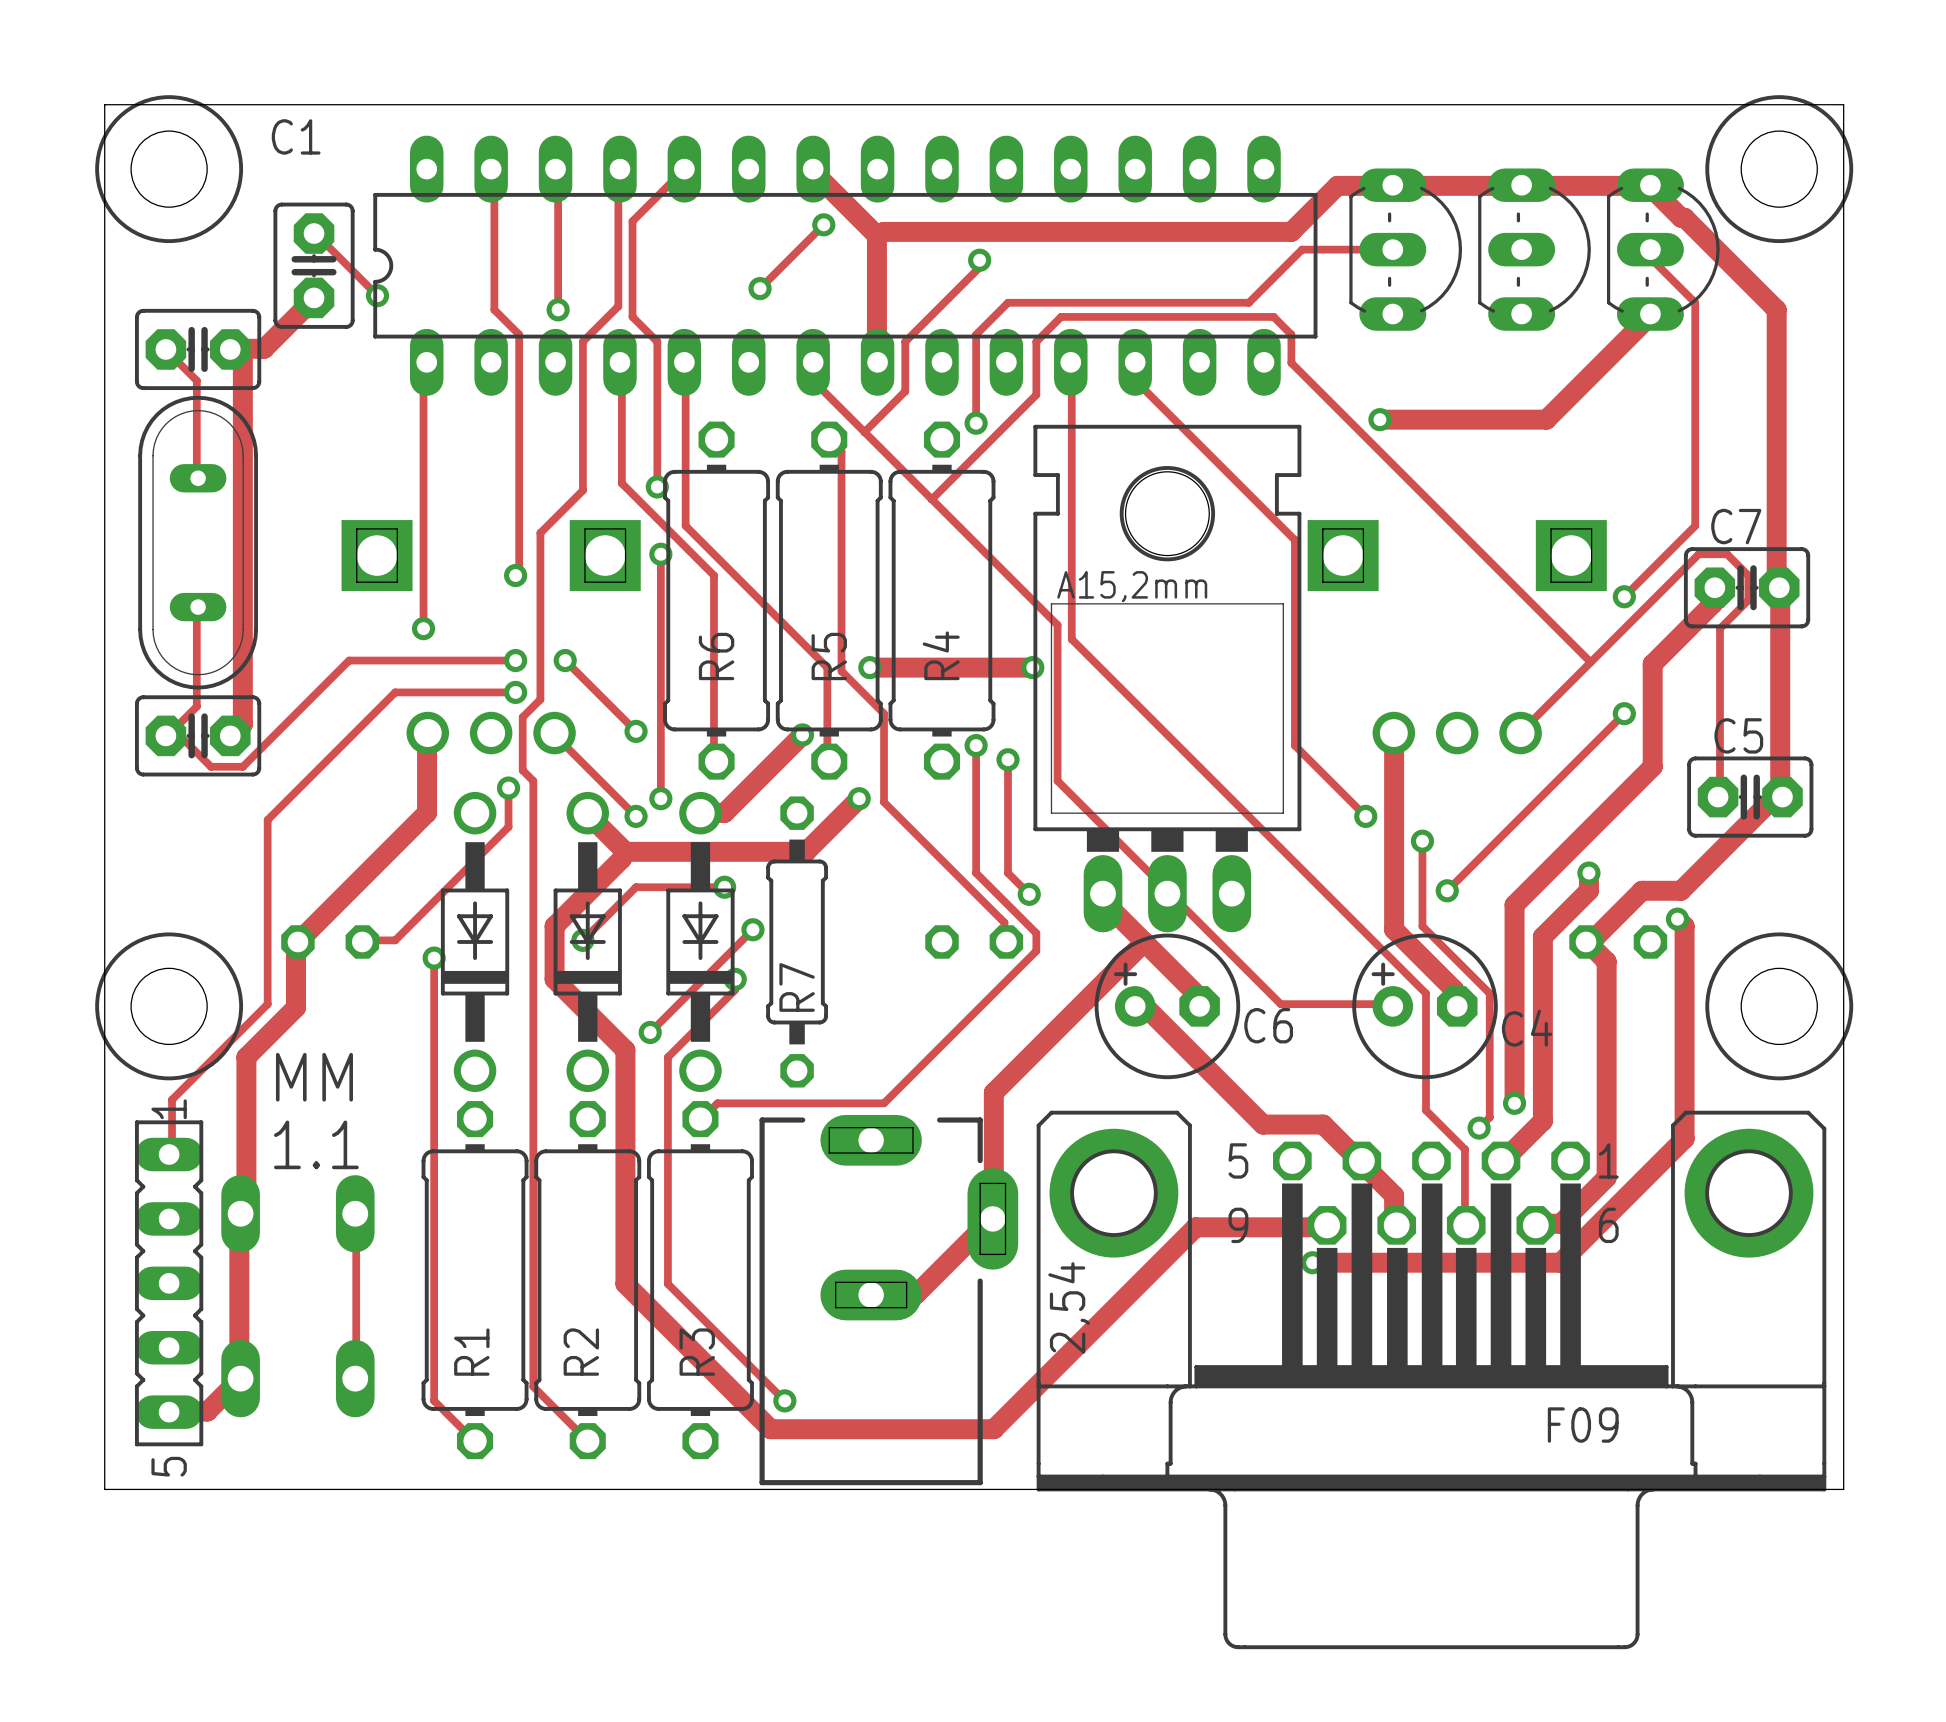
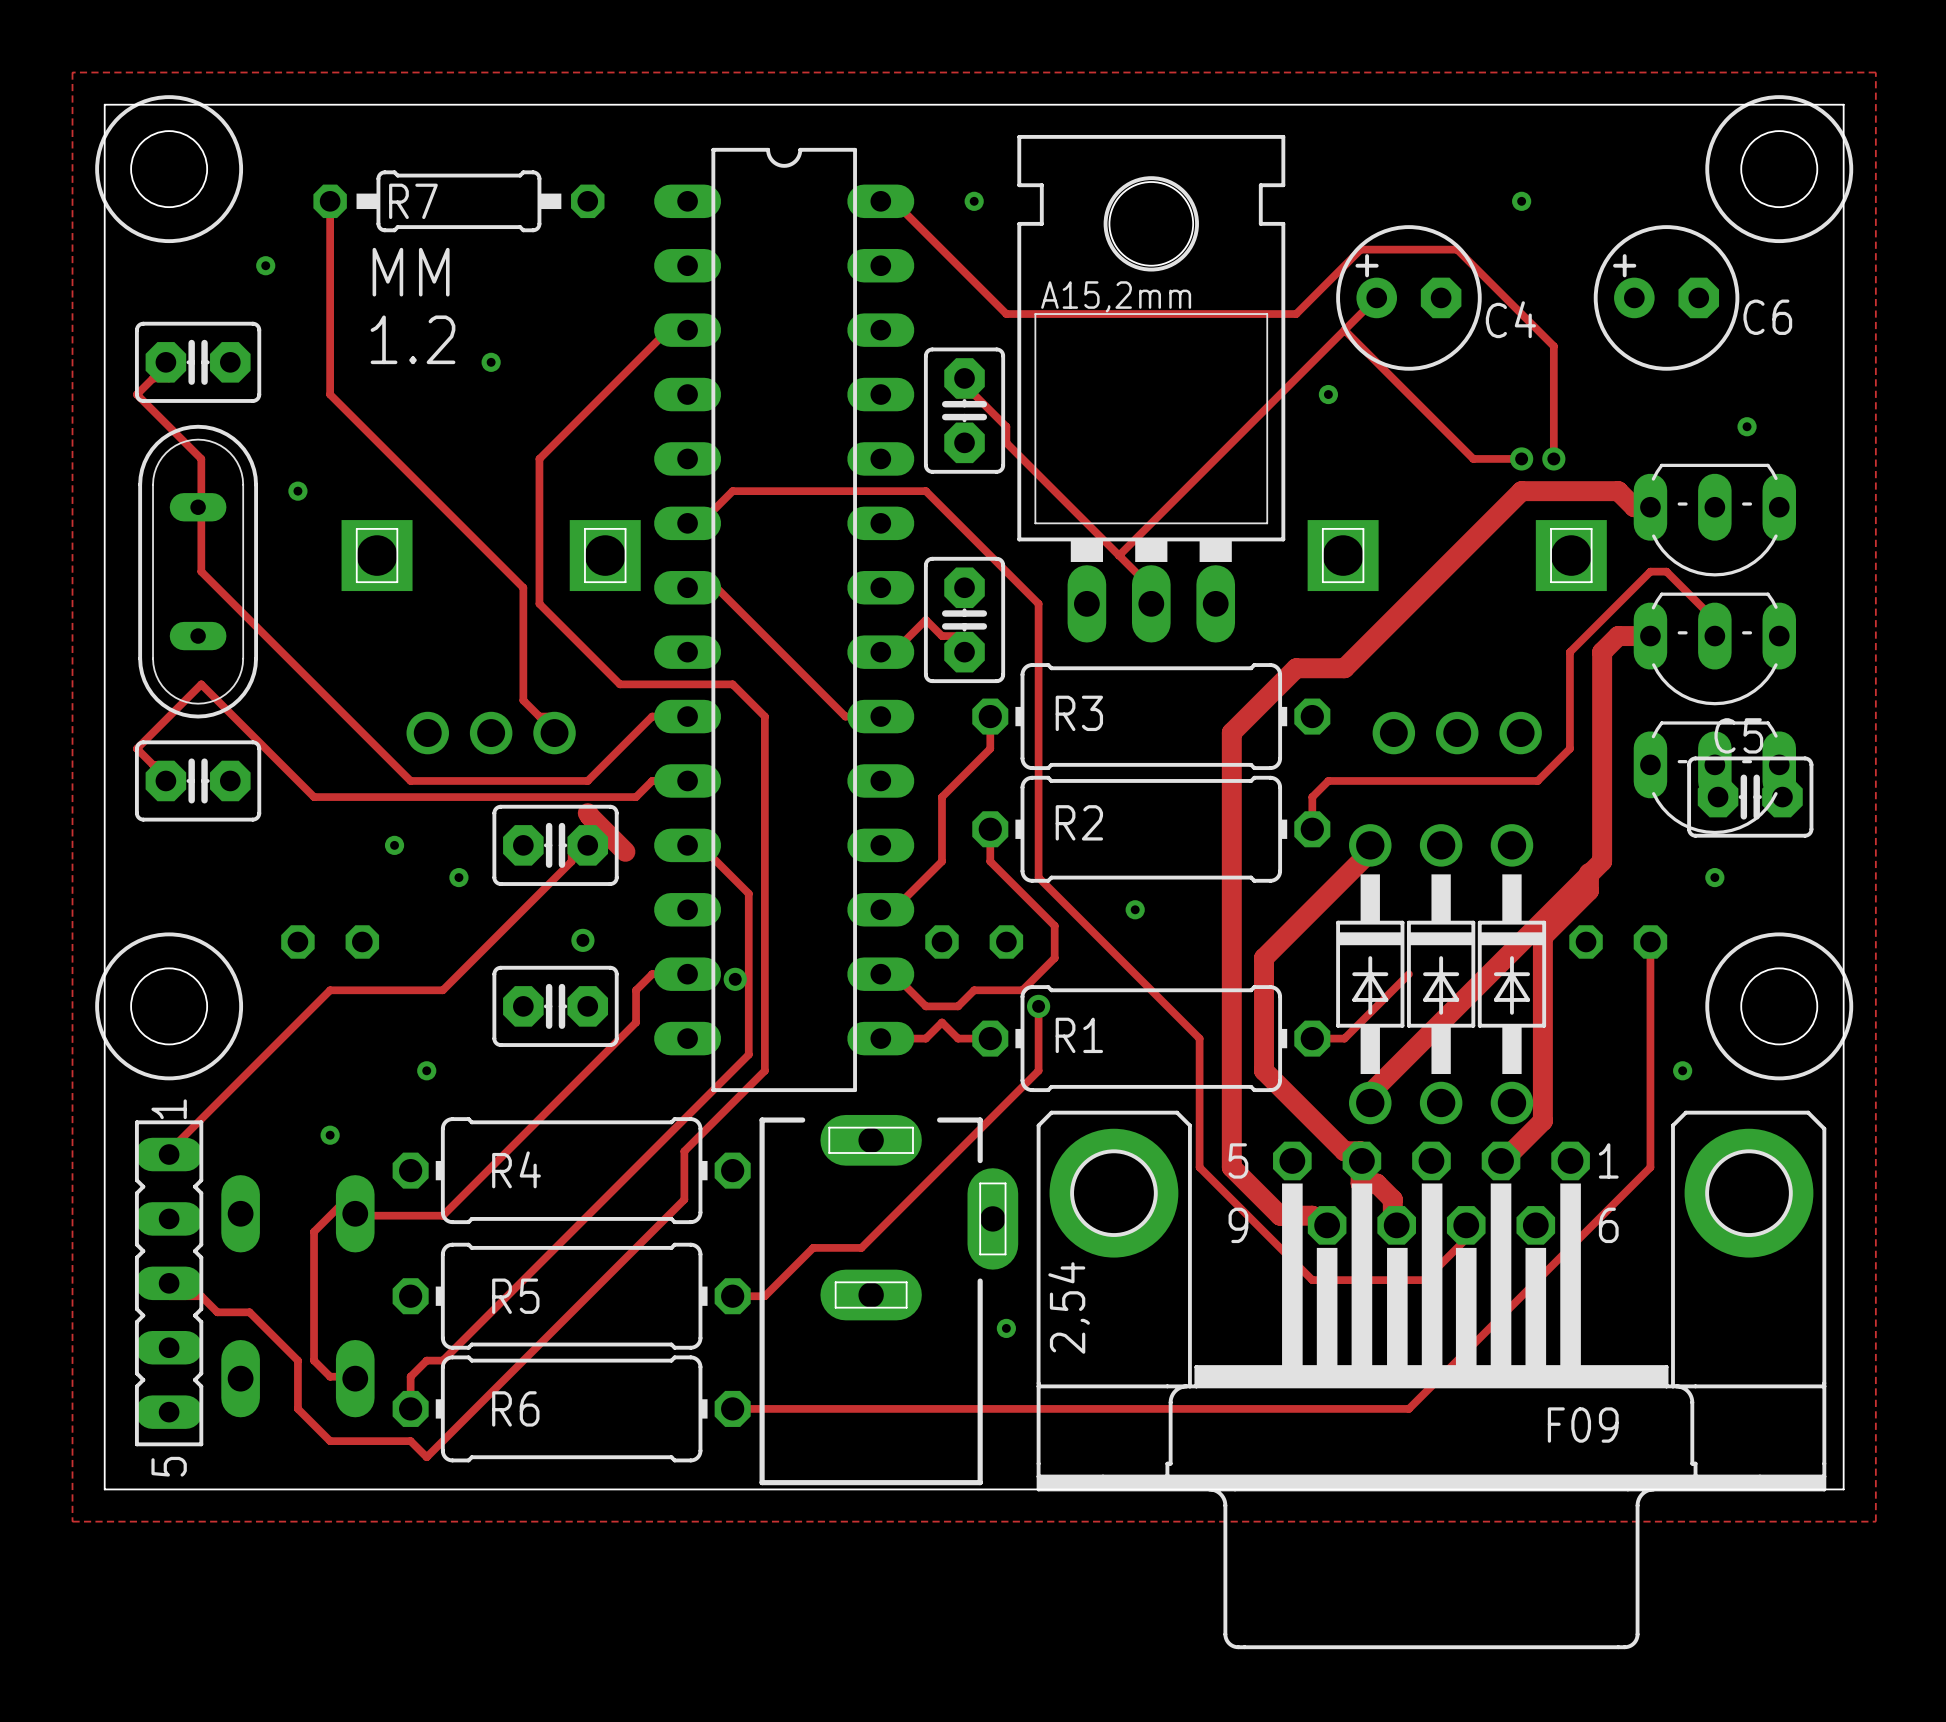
zone outline: none -> (72, 72) (72, 1521) (1875, 1521) (1875, 72) (72, 72)
track: (491, 169) (494, 171) (494, 309) (519, 334) (519, 571) (515, 575) -> none
track: (555, 169) (558, 171) (558, 309) -> none
track: (619, 169) (618, 171) (618, 306) (582, 341) (582, 490) (540, 533) (540, 699) (522, 717) (522, 770) (533, 780) (533, 1386) (587, 1441) -> none
track: (684, 169) (632, 221) (632, 316) (657, 341) (657, 486) -> none
track: (813, 169) (813, 171) (876, 235) -> none
via: none -> (974, 201)
via: none -> (1521, 201)
track: (823, 224) (760, 288) -> none
via: (823, 224) -> none
track: (314, 233) (377, 295) -> none
track: (876, 235) (877, 362) -> none
track: (876, 235) (884, 231) (1291, 231) (1337, 185) (1650, 185) (1681, 217) (1684, 217) (1776, 309) (1776, 579) (1780, 589) (1780, 795) (1782, 797) (1773, 798) (1681, 890) (1642, 890) (1596, 936) (1586, 941) (1606, 961) (1606, 1177) (1560, 1223) (1535, 1223) (1535, 1225) -> none
track: (1360, 249) (1302, 249) (1248, 302) (1008, 302) (976, 334) (976, 423) -> (1360, 249) (1296, 314) (1006, 314) (893, 201) (880, 201)
track: none -> (1392, 249) (1457, 249) (1553, 346) (1553, 458)
part: (1405, 249) -> none
part: (1534, 249) -> none
track: (1650, 249) (1652, 249) (1652, 260) (1695, 302) (1695, 525) (1624, 596) -> none
part: (1663, 249) -> none
track: (979, 260) (979, 267) (905, 341) (905, 391) (864, 432) -> none
via: (979, 260) -> none
via: none -> (265, 265)
C1: (314, 265) -> none
part rotation: 0° (845, 265) -> 90° clockwise (784, 619)
text: none -> MM (411, 272)
via: (760, 288) -> none
via: (377, 295) -> none
track: (314, 297) (264, 348) (230, 349) (242, 355) (242, 724) (230, 735) -> none
track: none -> (1376, 297) (1119, 555)
via: (558, 309) -> none
track: (1650, 314) (1546, 419) (1379, 419) -> none
track: none -> (687, 330) (668, 330) (539, 458) (539, 603) (619, 684) (732, 684) (764, 716) (764, 1070) (684, 1151) (684, 1199) (426, 1457) (410, 1441) (330, 1441) (297, 1408) (297, 1360) (249, 1312) (217, 1312) (201, 1296) (169, 1296) (169, 1283)
track: none -> (1344, 330) (1473, 458) (1521, 458)
text: none -> 1.2 (413, 339)
track: (165, 349) (196, 380) (198, 478) -> none
part position: (198, 349) -> (198, 362)
track: none -> (165, 362) (169, 362) (169, 378) (153, 378) (136, 394) (201, 458) (201, 571) (410, 780) (587, 780) (652, 716) (687, 716)
track: (426, 362) (423, 362) (423, 628) -> none
via: none -> (491, 362)
track: (619, 362) (621, 362) (621, 483) (713, 575) (713, 759) (716, 761) -> none
track: (684, 362) (685, 525) (827, 667) (827, 759) (829, 761) -> none
track: (813, 362) (813, 380) (1057, 625) (1057, 780) (1167, 890) (1167, 893) (1170, 894) (1280, 1004) (1390, 1004) (1392, 1006) -> none
track: (1070, 362) (1071, 639) (1425, 993) (1425, 1110) (1464, 1149) (1466, 1225) -> (687, 523) (700, 523) (732, 491) (925, 491) (1038, 603) (1038, 877) (1199, 1038) (1199, 1167) (1312, 1280) (1425, 1280) (1473, 1231) (1466, 1225)
track: (1135, 362) (1135, 380) (1294, 540) (1294, 745) (1365, 816) -> none
track: none -> (964, 378) (958, 378) (958, 394) (974, 394) (1006, 426) (1006, 442) (1151, 587) (1151, 603)
via: none -> (1328, 394)
part: none -> (964, 410)
via: (1379, 419) -> none
via: (976, 423) -> none
via: none -> (1747, 426)
track: (829, 439) (841, 451) (841, 671) (884, 713) (884, 802) (1004, 922) (1004, 940) (1006, 941) -> none
via: none -> (1521, 458)
via: none -> (1553, 458)
via: (657, 486) -> none
via: none -> (297, 491)
track: (931, 499) (1036, 394) (1036, 341) (1061, 316) (1273, 316) (1291, 334) (1291, 362) (1590, 662) -> none
part: none -> (1714, 520)
part position: (198, 542) -> (198, 571)
track: (660, 554) (660, 798) -> none
via: (660, 554) -> none
via: (515, 575) -> none
track: none -> (687, 587) (716, 587) (845, 716) (880, 716)
track: (1714, 587) (1712, 589) (1712, 603) (1652, 664) (1652, 766) (1514, 904) (1514, 1103) -> none
C7: (1747, 587) -> none
via: (1624, 596) -> none
R6 rotation: 0° (716, 600) -> 90° clockwise (571, 1408)
R6 position: (716, 600) -> (571, 1408)
R5 rotation: 0° (829, 600) -> 90° clockwise (571, 1296)
R5 position: (829, 600) -> (571, 1296)
R4 rotation: 0° (941, 600) -> 90° clockwise (571, 1170)
R4 position: (941, 600) -> (571, 1170)
track: (198, 607) (196, 706) (165, 735) (175, 731) (210, 766) (242, 766) (349, 660) (515, 660) -> none
part: none -> (964, 619)
via: (423, 628) -> none
track: none -> (1650, 636) (1618, 636) (1602, 652) (1602, 861) (1360, 1103) (1370, 1103)
track: none -> (1714, 636) (1714, 619) (1666, 571) (1650, 571) (1569, 652) (1569, 748) (1537, 780) (1328, 780) (1312, 797) (1312, 829)
part: none -> (1714, 648)
track: none -> (880, 652) (893, 652) (925, 619) (941, 636) (958, 636) (974, 652) (964, 652)
via: (515, 660) -> none
track: (565, 660) (636, 731) -> none
via: (565, 660) -> none
track: (869, 667) (1032, 667) -> none
via: (869, 667) -> none
via: (1032, 667) -> none
part position: (1167, 678) -> (1151, 388)
track: (515, 692) (395, 692) (267, 819) (267, 1004) (172, 1099) (172, 1152) (169, 1154) -> (587, 845) (571, 845) (571, 861) (442, 990) (330, 990) (169, 1151) (169, 1154)
via: (515, 692) -> none
track: (1624, 713) (1447, 890) -> none
via: (1624, 713) -> none
track: none -> (990, 716) (990, 748) (941, 797) (941, 861) (893, 909) (880, 909)
via: (636, 731) -> none
track: (427, 733) (427, 812) (297, 941) (295, 951) (295, 1007) (246, 1057) (246, 1206) (239, 1216) (240, 1378) (207, 1411) (169, 1412) -> none
track: (554, 733) (636, 816) -> (554, 733) (555, 716) (539, 716) (523, 700) (523, 587) (330, 394) (330, 201)
track: (1393, 733) (1394, 929) (1454, 989) (1454, 1004) (1457, 1006) -> none
track: (1520, 733) (1698, 554) (1727, 554) (1748, 575) (1748, 600) (1720, 628) (1720, 795) (1718, 797) -> none
track: (802, 734) (724, 812) (700, 813) -> none
via: (802, 734) -> none
part position: (198, 735) -> (198, 780)
track: (976, 745) (976, 873) (1036, 933) (1036, 951) (884, 1103) (717, 1103) (700, 1119) -> none
via: (976, 745) -> none
track: (1008, 759) (1008, 873) (1029, 894) -> none
via: (1008, 759) -> none
part: none -> (1714, 777)
track: none -> (165, 780) (169, 780) (169, 764) (153, 764) (136, 748) (201, 684) (314, 797) (636, 797) (652, 780) (687, 780)
track: (508, 788) (508, 827) (395, 940) (363, 940) (362, 941) -> none
via: (508, 788) -> none
via: (660, 798) -> none
track: (859, 798) (806, 851) (625, 851) (621, 858) (554, 926) (554, 979) (625, 1050) (625, 1283) (770, 1429) (993, 1429) (1195, 1227) (1326, 1227) (1327, 1225) -> (1650, 507) (1634, 507) (1618, 491) (1521, 491) (1344, 668) (1296, 668) (1231, 732) (1231, 1167) (1280, 1215) (1312, 1215) (1327, 1225)
via: (859, 798) -> none
via: (636, 816) -> none
via: (1365, 816) -> none
track: none -> (990, 829) (990, 861) (1054, 925) (1054, 958) (1022, 990) (974, 990) (958, 1006) (925, 1006) (893, 974) (880, 974)
track: (1422, 841) (1422, 926) (1489, 993) (1489, 1117) (1479, 1128) -> none
via: (1422, 841) -> none
via: none -> (394, 845)
part: none -> (555, 845)
track: none -> (687, 845) (700, 845) (748, 893) (748, 1054) (442, 1360) (426, 1360) (410, 1376) (410, 1408)
via: (1588, 873) -> none
via: none -> (458, 877)
via: none -> (1714, 877)
track: (724, 887) (636, 887) (582, 940) -> none
via: (724, 887) -> none
via: (1447, 890) -> none
track: (1103, 893) (1103, 901) (1199, 997) (1199, 1006) -> none
via position: (1029, 894) -> (1038, 1006)
via: none -> (1135, 909)
track: (1677, 919) (1684, 926) (1684, 1138) (1560, 1262) (1312, 1262) -> none
via: (1677, 919) -> none
track: (752, 929) (650, 1032) -> none
via: (752, 929) -> none
part: (475, 941) -> none
part: (587, 941) -> none
part: (700, 941) -> none
R7 rotation: 0° (797, 941) -> 90° clockwise (458, 201)
R7 position: (797, 941) -> (458, 201)
track: none -> (1650, 941) (1650, 1167) (1408, 1408) (732, 1408)
track: (1144, 942) (993, 1092) (992, 1218) (915, 1294) (871, 1294) -> none
track: (434, 958) (434, 1400) (475, 1441) -> none
via: (434, 958) -> none
part: none -> (1370, 974)
track: none -> (1408, 974) (1344, 1038) (1312, 1038)
part: none -> (1441, 974)
part: none -> (1511, 974)
track: (735, 979) (735, 989) (667, 1057) (667, 1283) (784, 1400) -> none
part: none -> (555, 1006)
track: none -> (1038, 1006) (1038, 1070) (861, 1247) (813, 1247) (764, 1296) (732, 1296)
track: (1135, 1006) (1146, 1007) (1263, 1124) (1323, 1124) (1361, 1160) (1362, 1163) (1394, 1195) (1394, 1223) (1396, 1225) -> (1370, 845) (1376, 845) (1264, 958) (1264, 1070) (1344, 1151) (1360, 1151) (1360, 1183) (1376, 1183) (1392, 1199) (1392, 1215) (1396, 1225)
C6 position: (1167, 1006) -> (1666, 297)
C4 position: (1425, 1006) -> (1408, 297)
via: (650, 1032) -> none
track: none -> (880, 1038) (925, 1038) (941, 1022) (958, 1038) (990, 1038)
via: none -> (426, 1070)
via: none -> (1682, 1070)
text: MM (314, 1077) -> none
via: (1514, 1103) -> none
via: (1479, 1128) -> none
via: none -> (330, 1135)
text: 1.1 (316, 1144) -> none
track: (355, 1213) (355, 1378) -> (687, 974) (652, 974) (636, 990) (636, 1022) (442, 1215) (362, 1215) (355, 1213) (346, 1199) (314, 1231) (314, 1360) (330, 1376) (355, 1378)
via: (1312, 1262) -> none
R1 rotation: 0° (475, 1280) -> 90° clockwise (1151, 1038)
R1 position: (475, 1280) -> (1151, 1038)
R2 rotation: 0° (587, 1280) -> 90° clockwise (1151, 829)
R2 position: (587, 1280) -> (1151, 829)
R3 rotation: 0° (700, 1280) -> 90° clockwise (1151, 716)
R3 position: (700, 1280) -> (1151, 716)
via: none -> (1006, 1328)
via: (784, 1400) -> none

